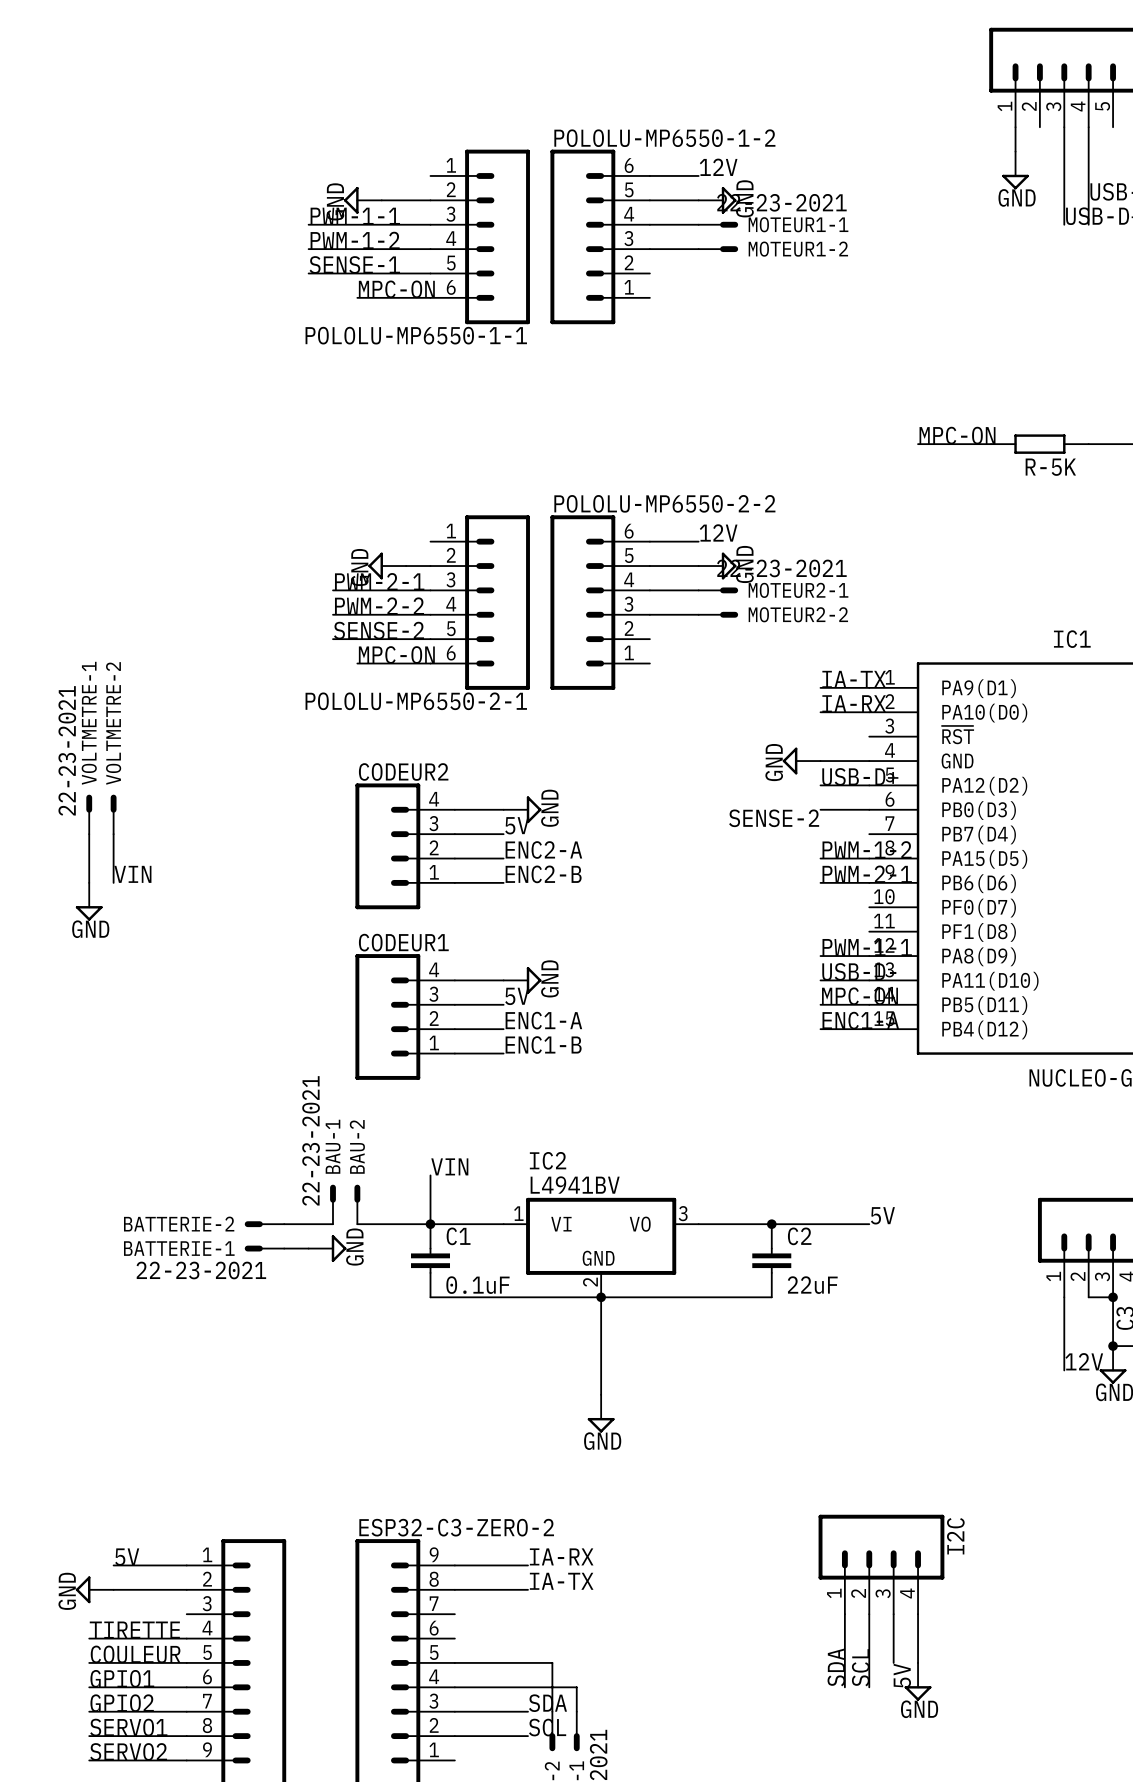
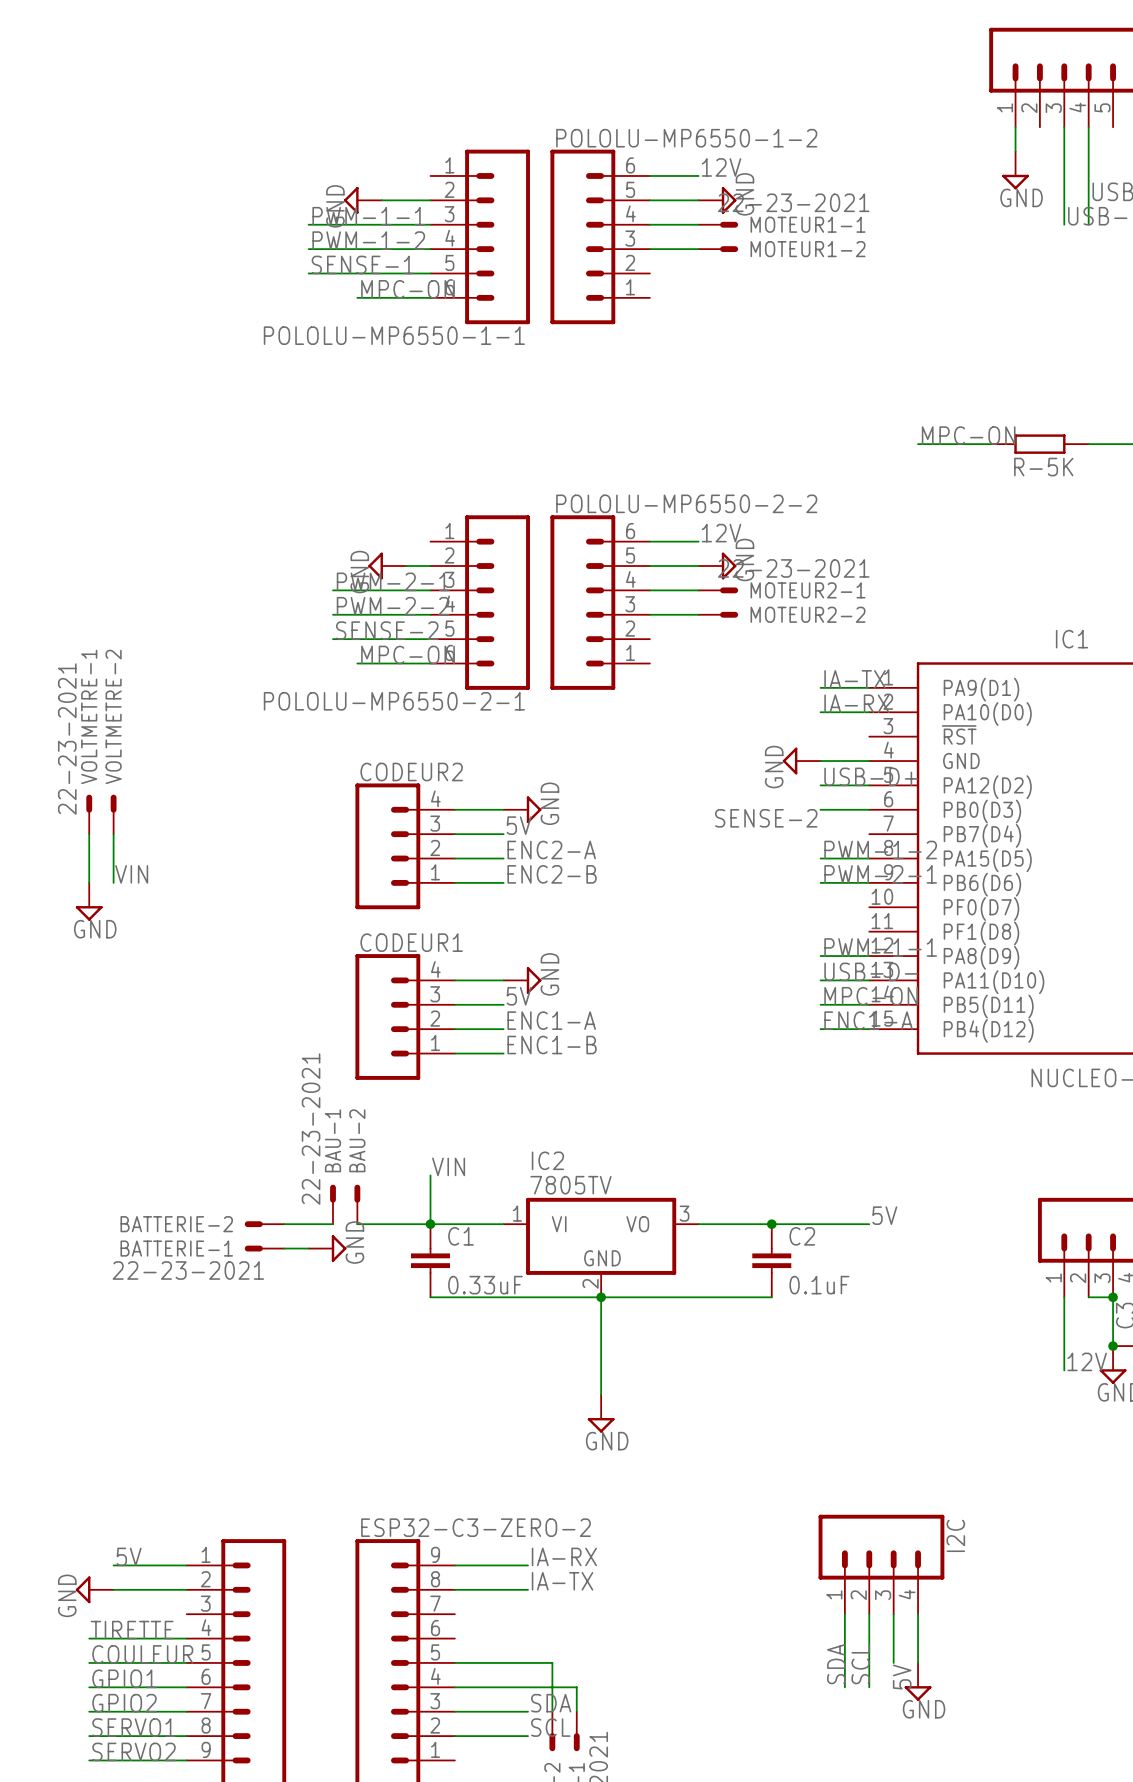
IC2 value: L4941BV (575, 1185) -> 7805TV (570, 1185)
C1 value: 0.1uF (477, 1285) -> 0.33uF (485, 1285)
C2 value: 22uF (812, 1285) -> 0.1uF (819, 1285)

